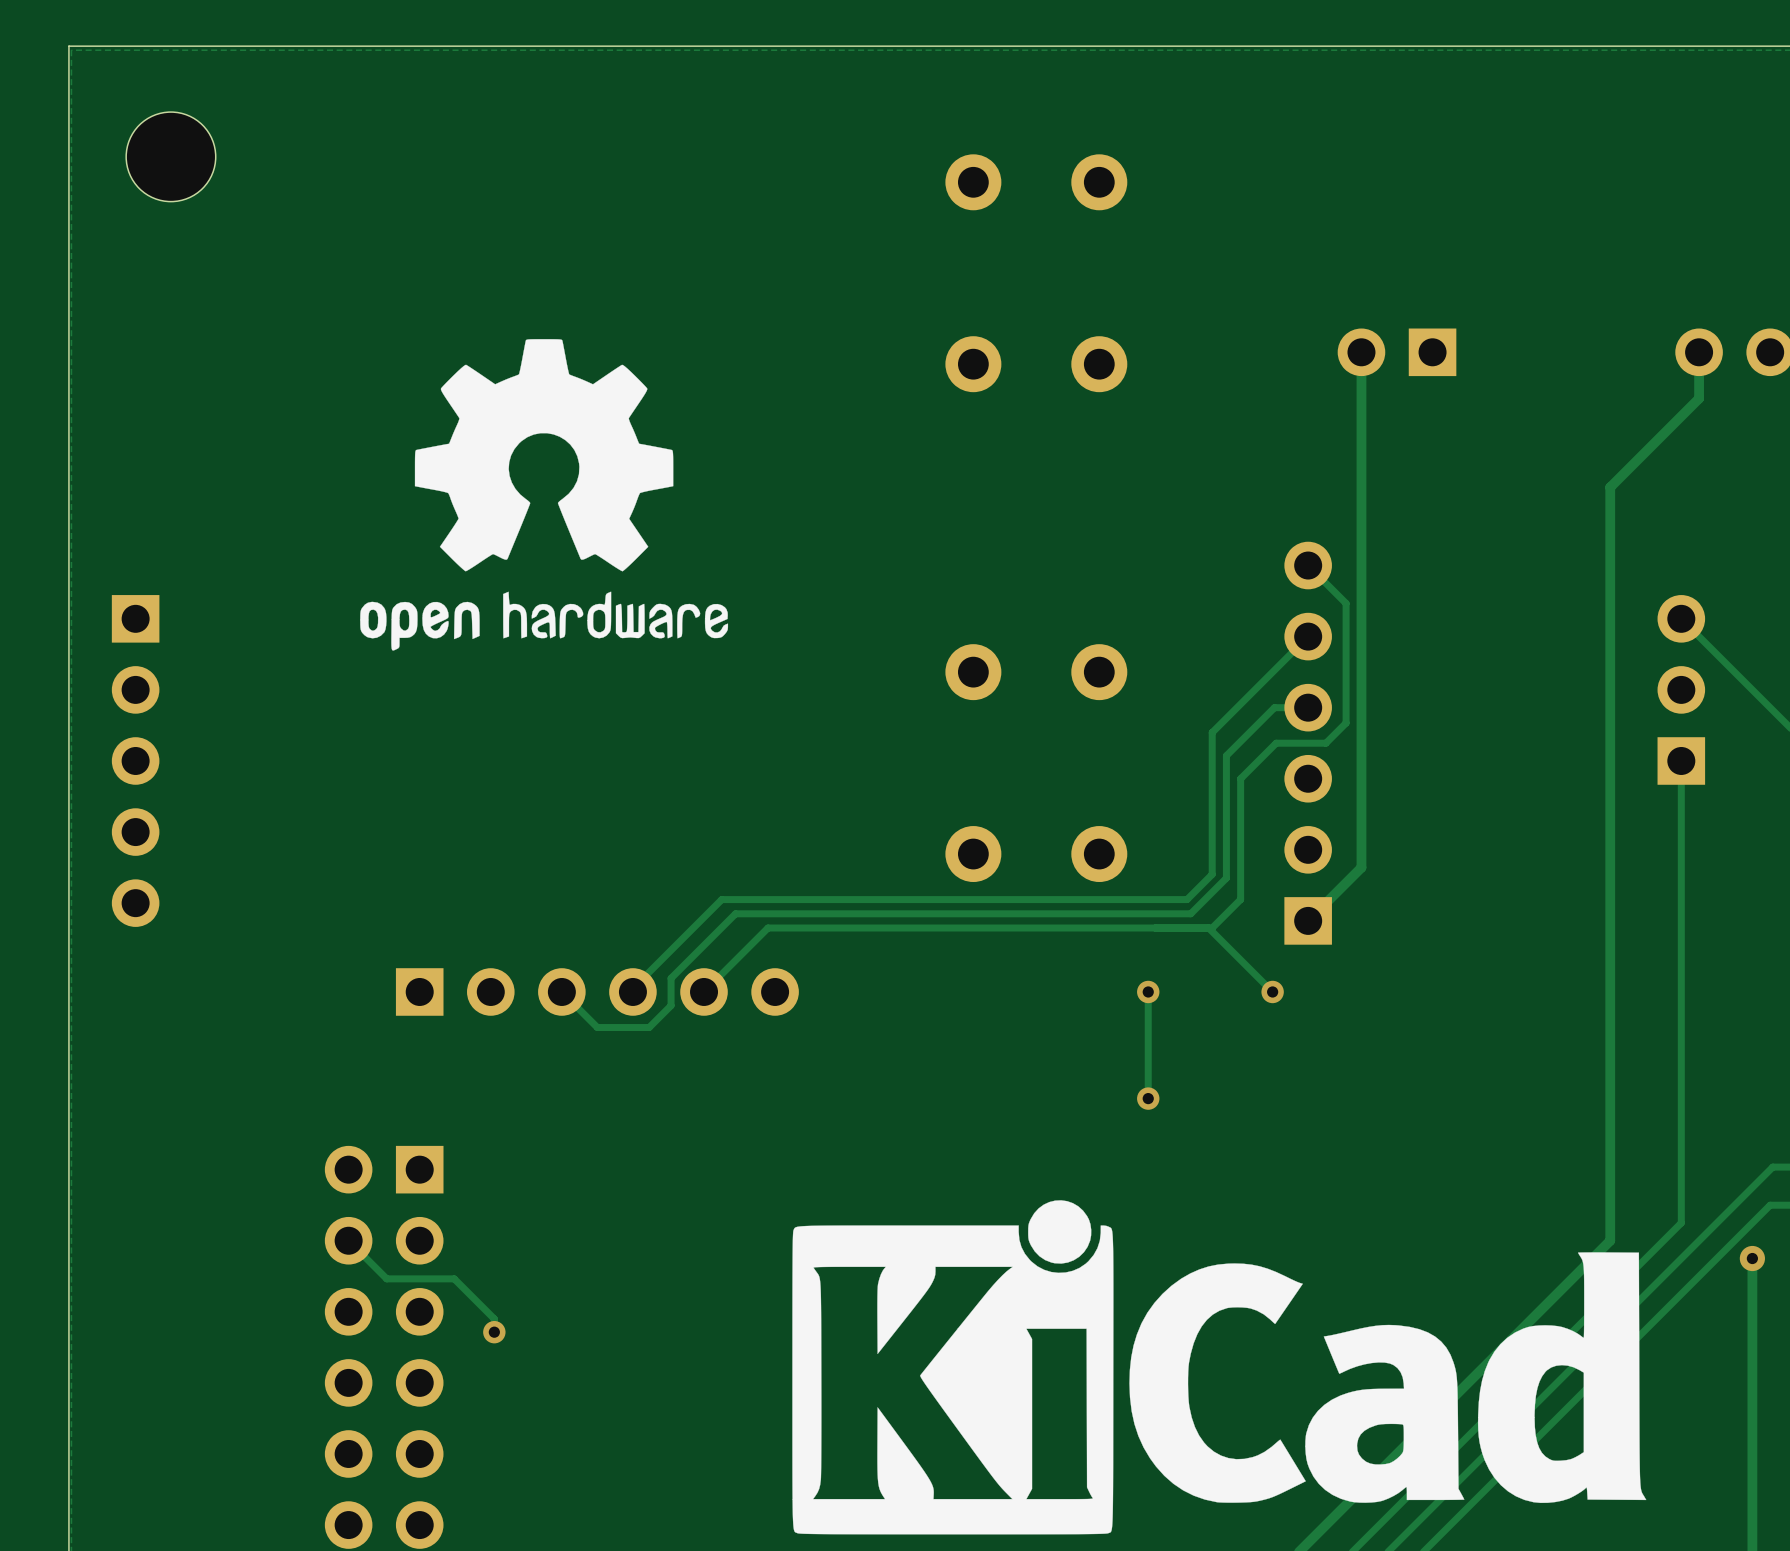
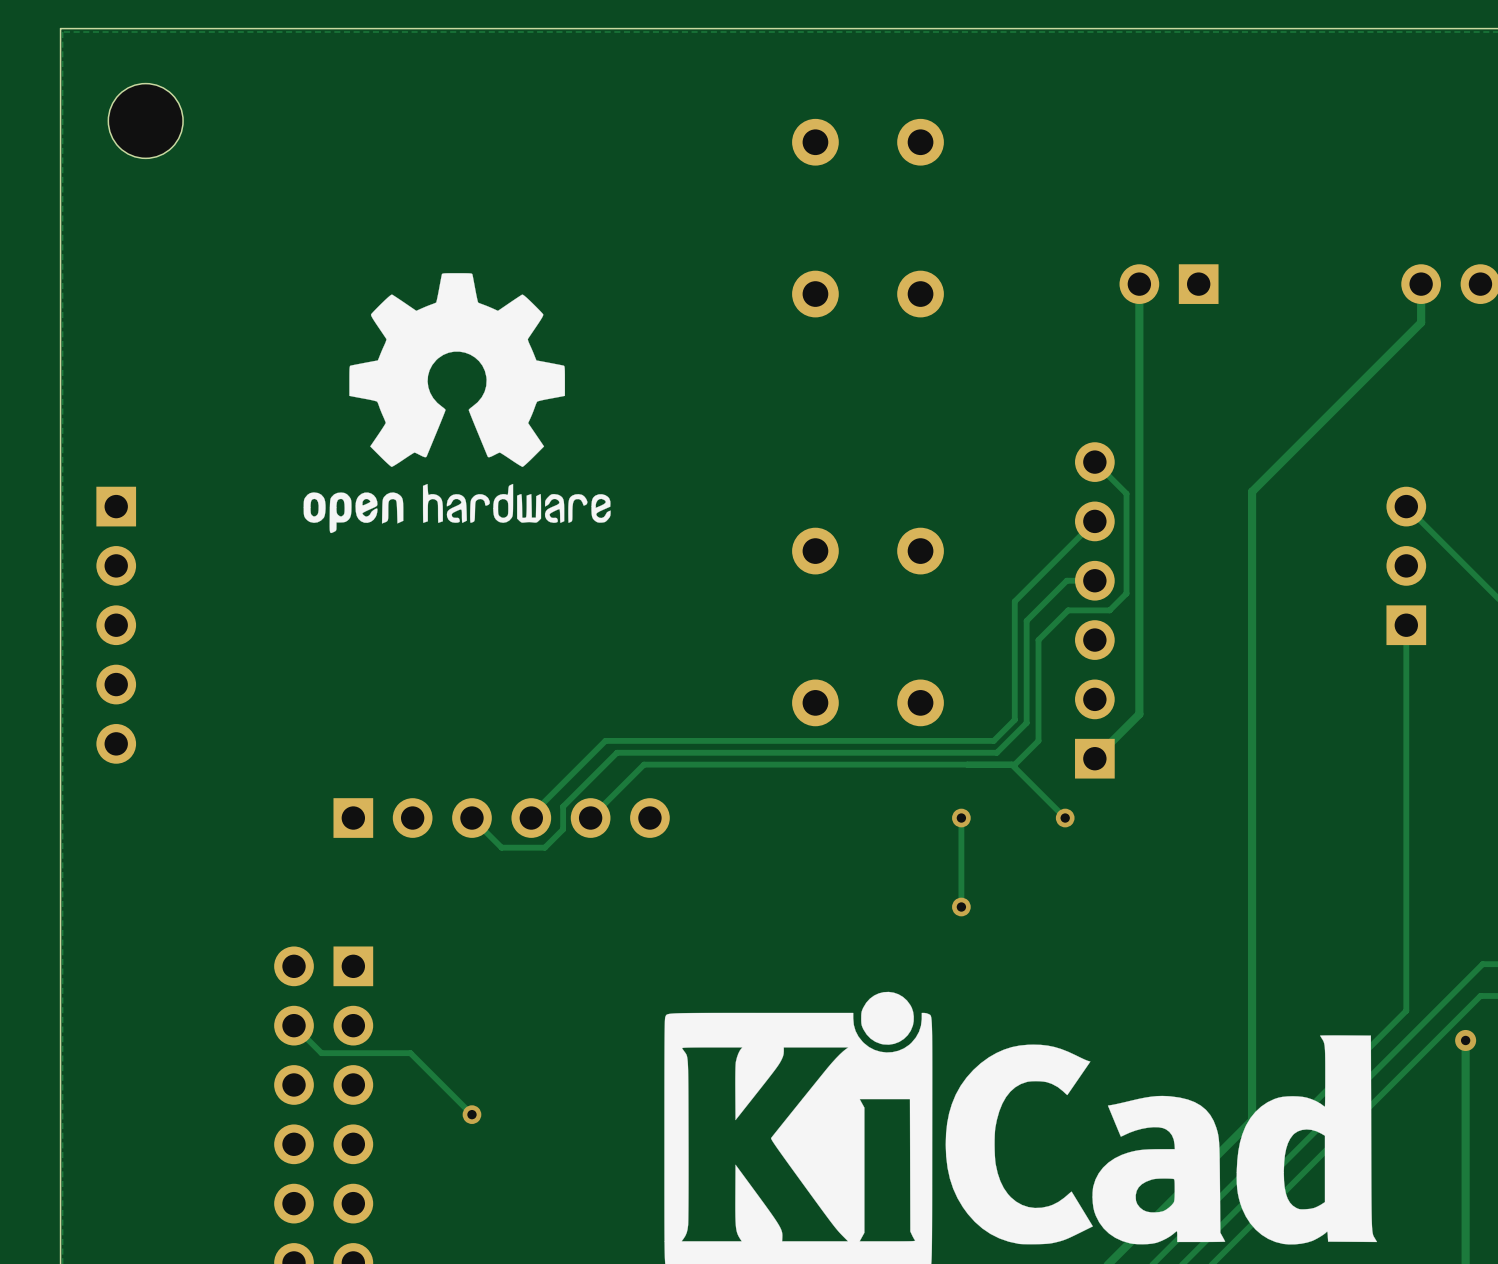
track: (1610, 487) (1610, 1240) (1496, 1354) -> (1346, 396) (1252, 491) (1252, 1120)
track: (381, 1273) (386, 1278) (454, 1278) (494, 1318) (494, 1332) -> (321, 1053) (410, 1053) (471, 1114)
via position: (494, 1332) -> (471, 1114)

